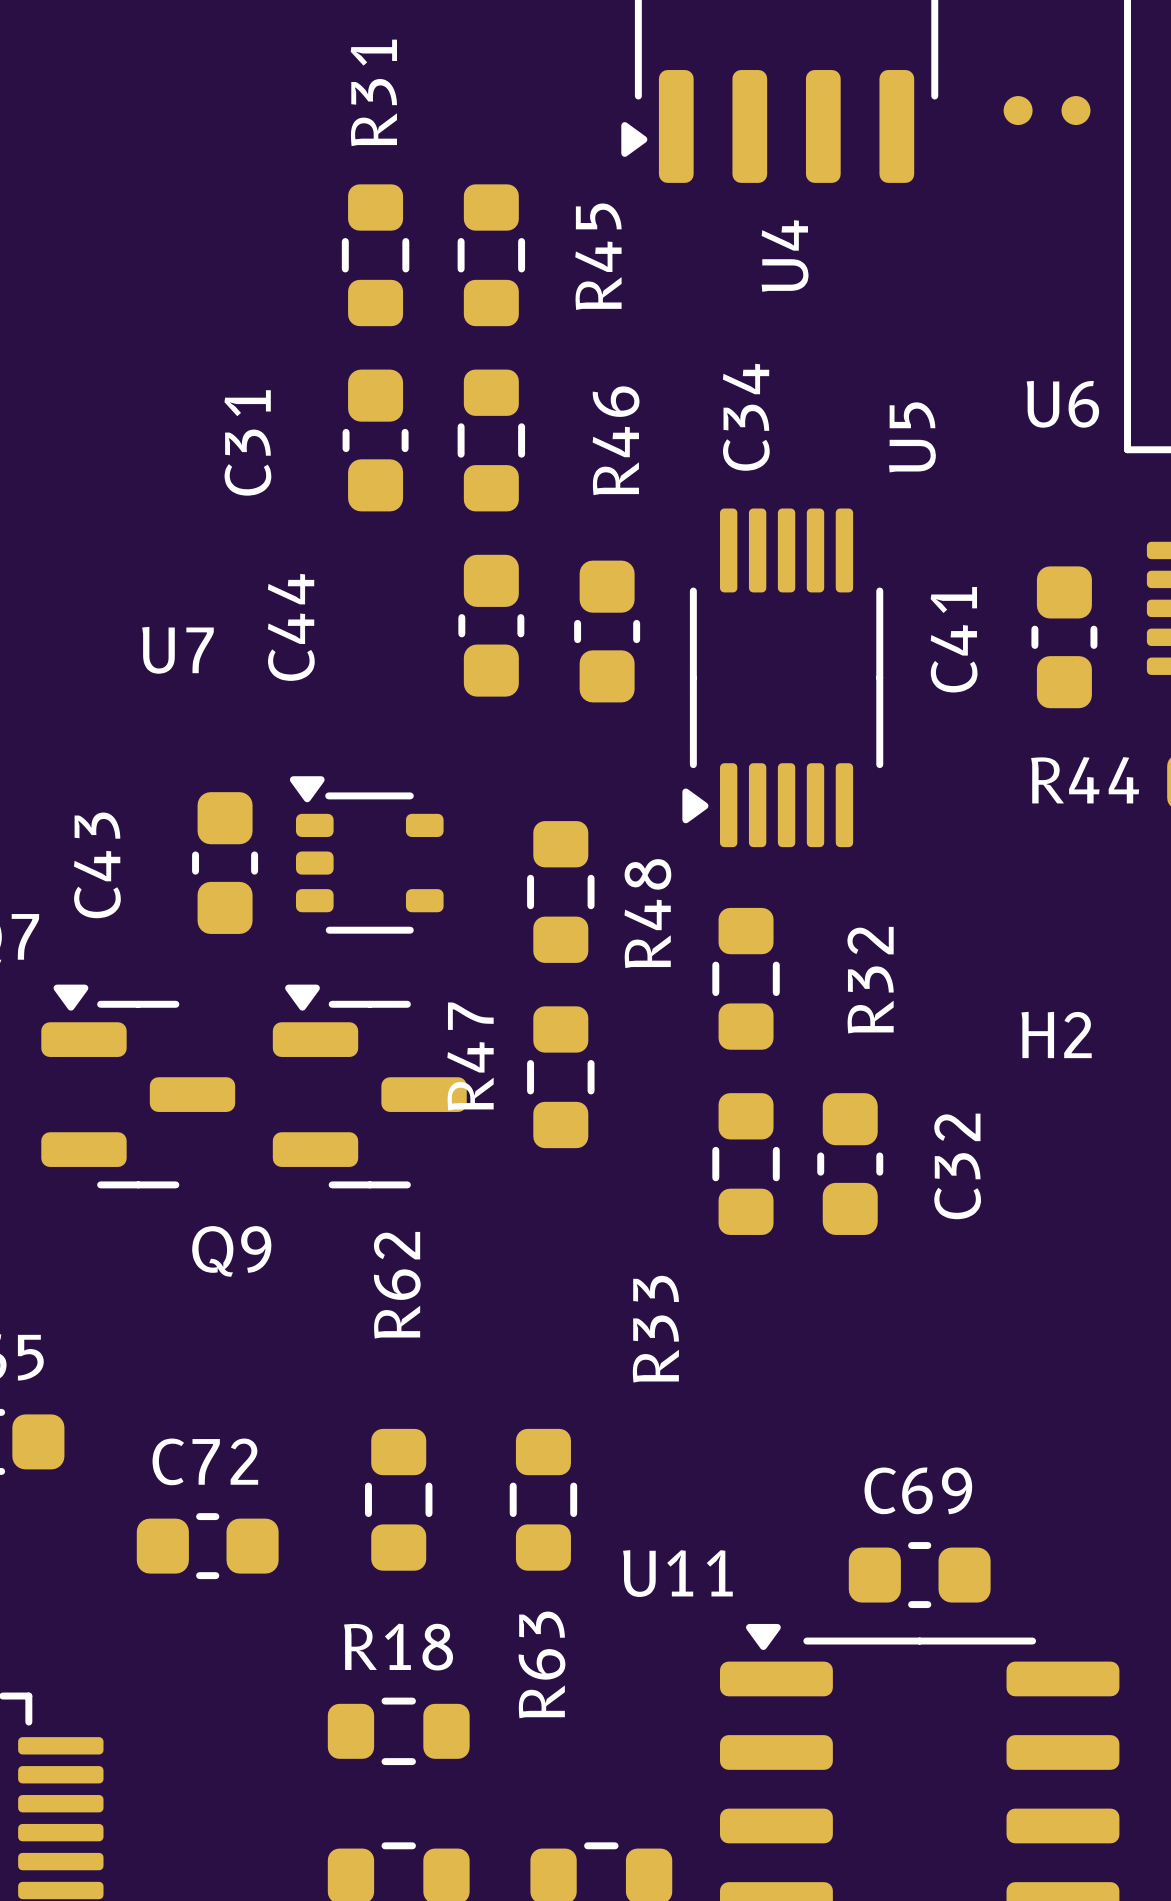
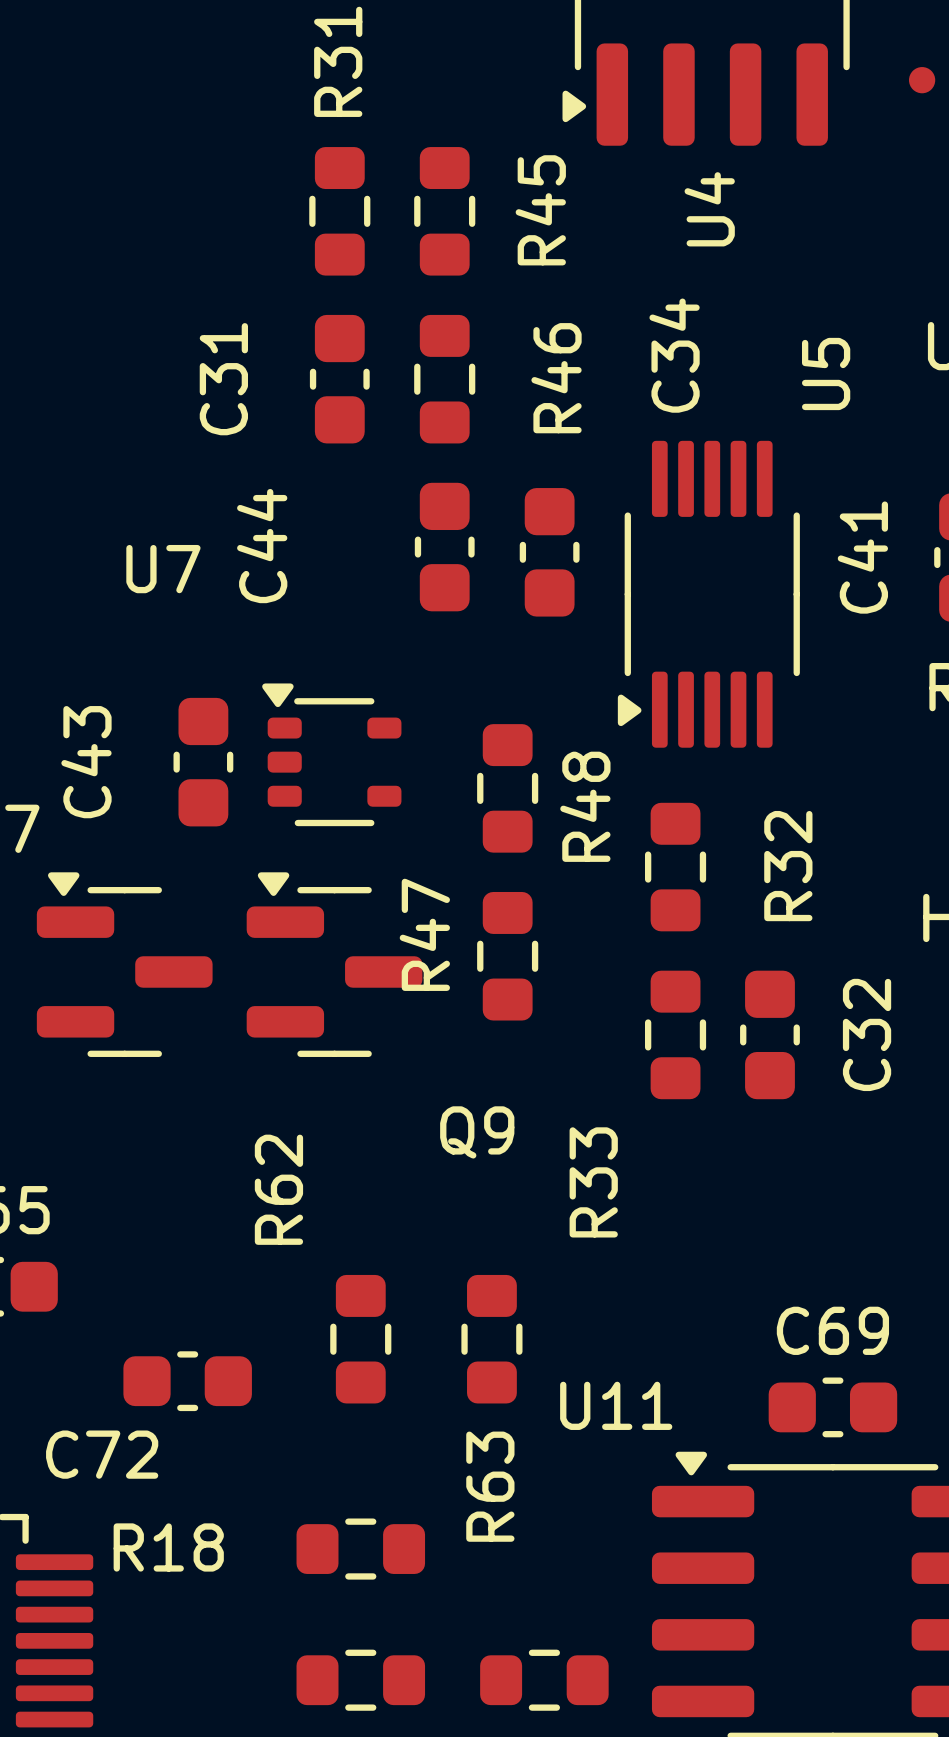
Q9 name position: Q9 (231, 1251) -> Q9 (477, 1132)
R62 name position: R62 (397, 1285) -> R62 (278, 1189)
C72 name position: C72 (205, 1461) -> C72 (102, 1454)
R18 name position: R18 (398, 1647) -> R18 (168, 1547)

